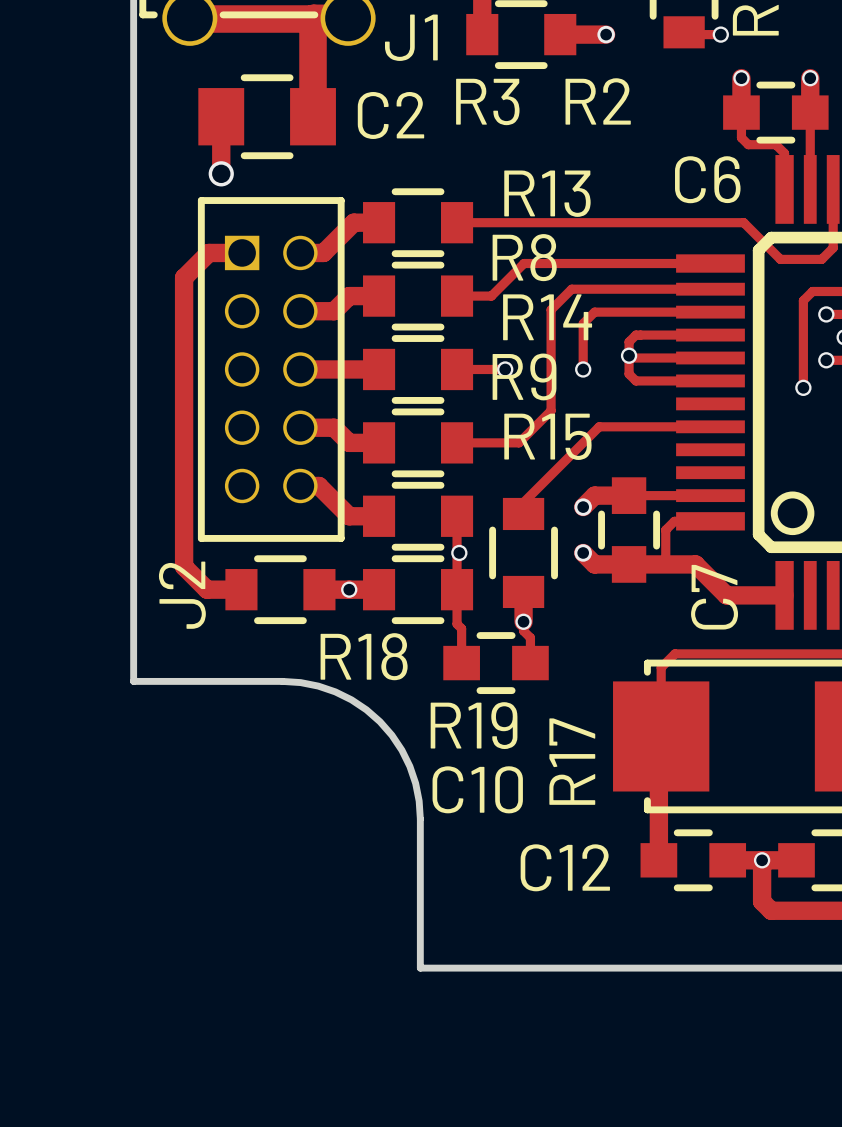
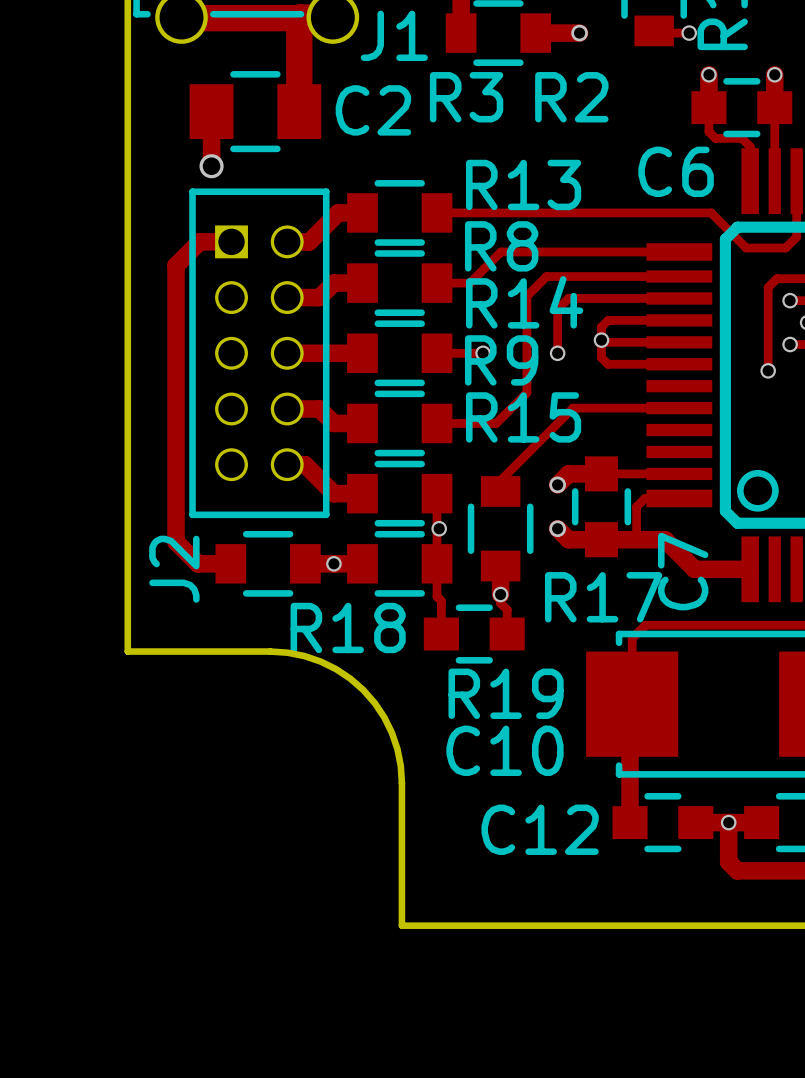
R19 name position: R19 (474, 725) -> R19 (506, 693)
R17 name rotation: 0° (572, 761) -> 90° clockwise (603, 597)
C10 name position: C10 (477, 789) -> C10 (505, 750)

